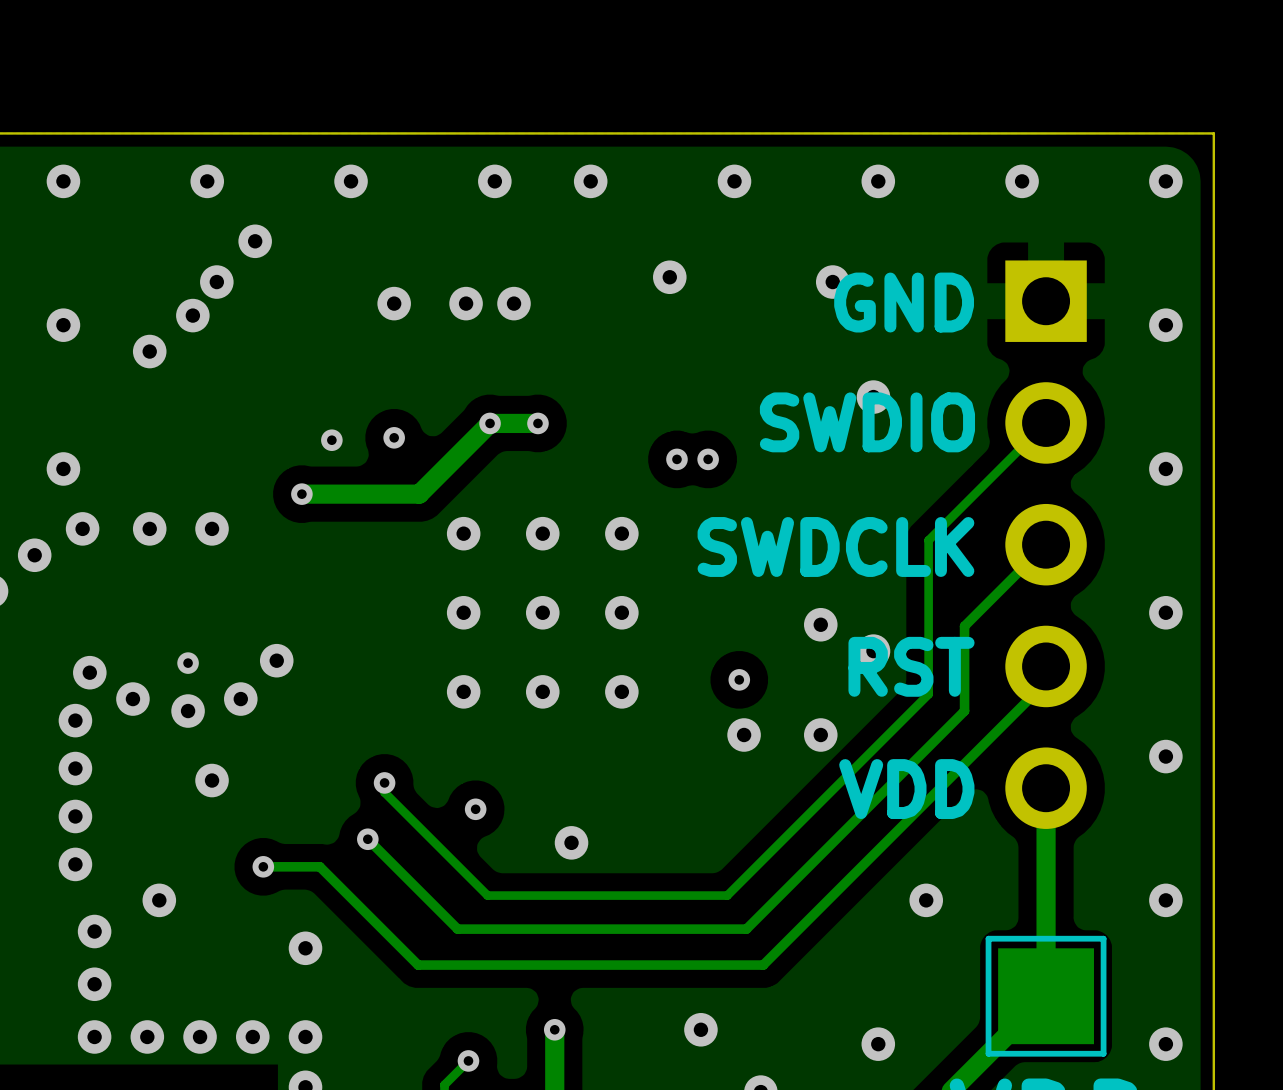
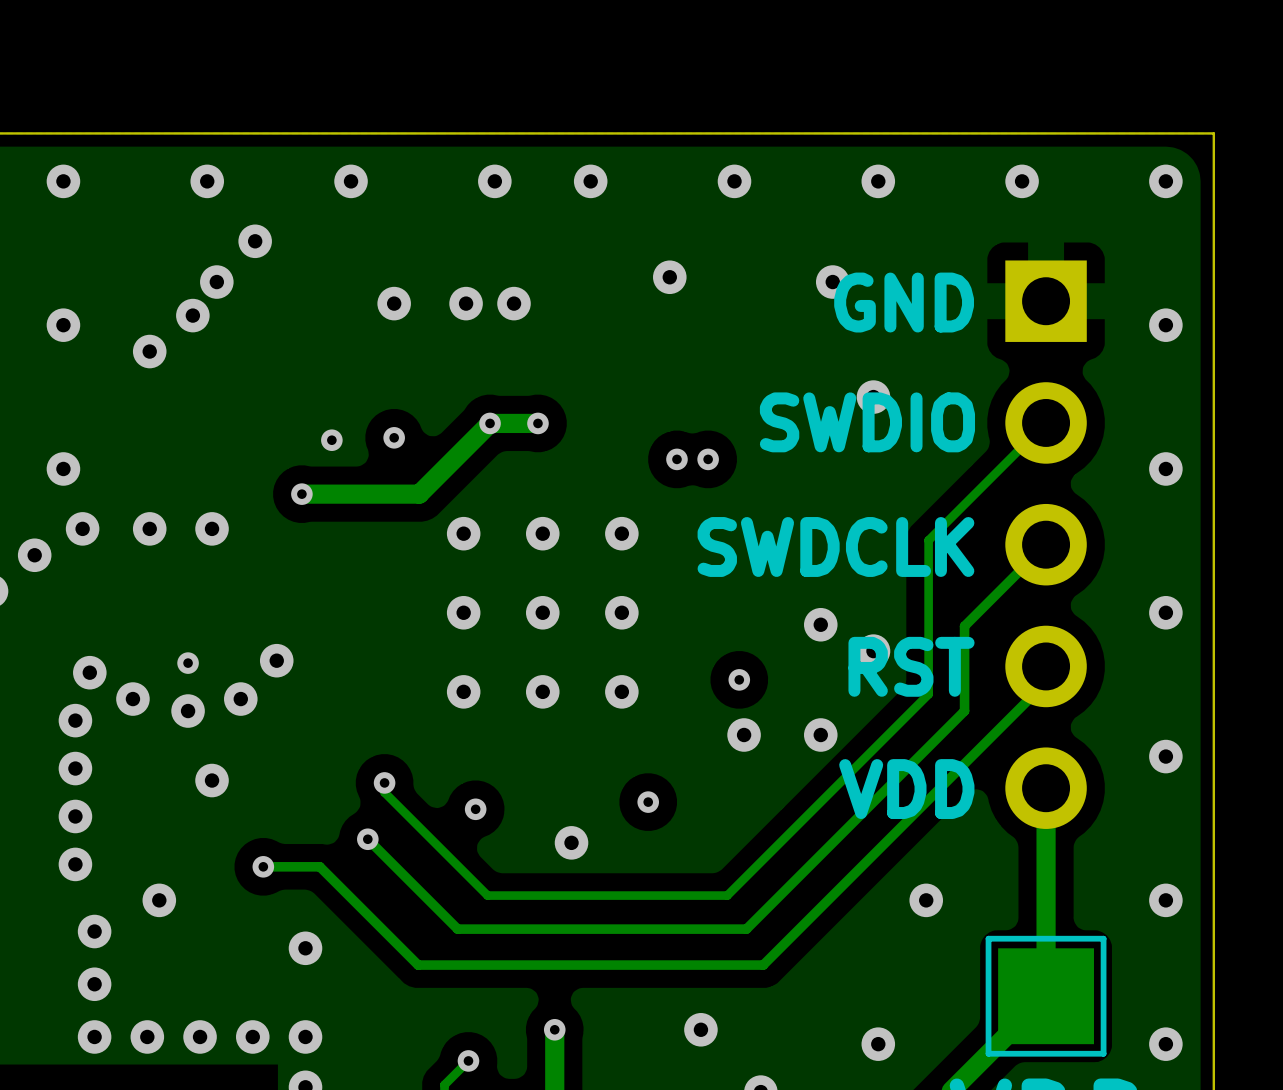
via: none -> (648, 802)

